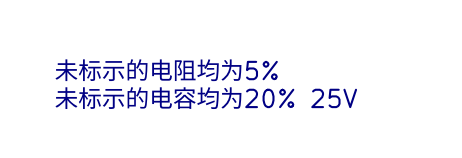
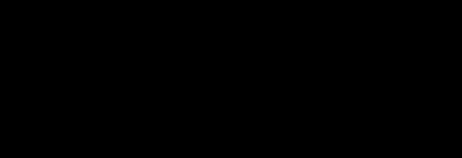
text: 未标示的电阻均为5% (166, 70) -> none
text: 未标示的电容均为20% 25V (205, 98) -> none

